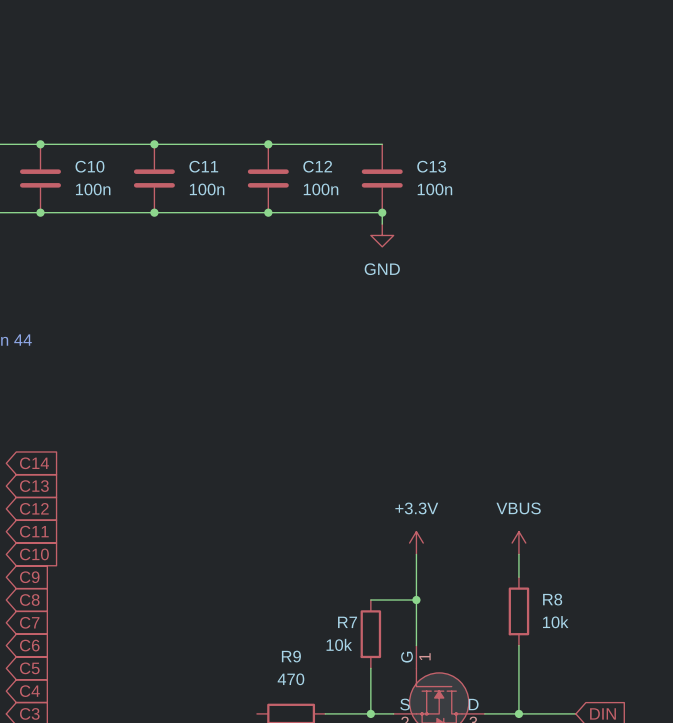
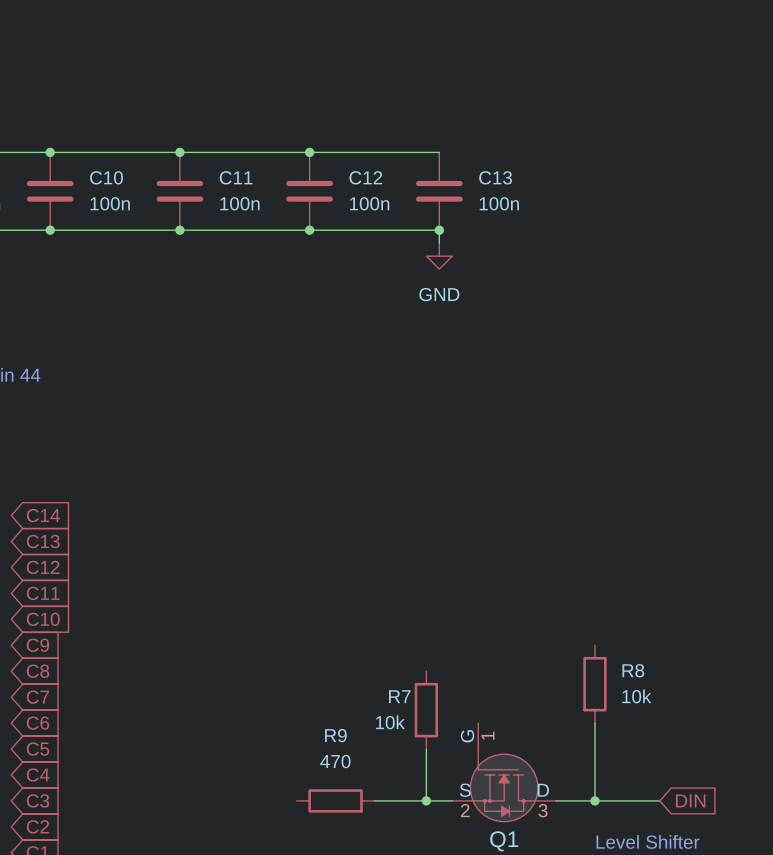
power symbol: +3.3V (416, 543) -> none
power symbol: VBUS (518, 543) -> none
wire: (416, 554) (416, 645) -> none
wire: (518, 554) (518, 577) -> none
wire: (370, 600) (416, 600) -> none
junction: (416, 600) -> none

